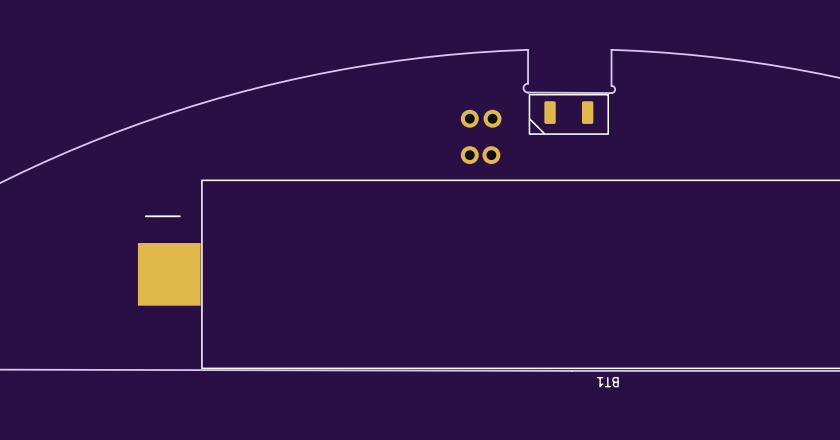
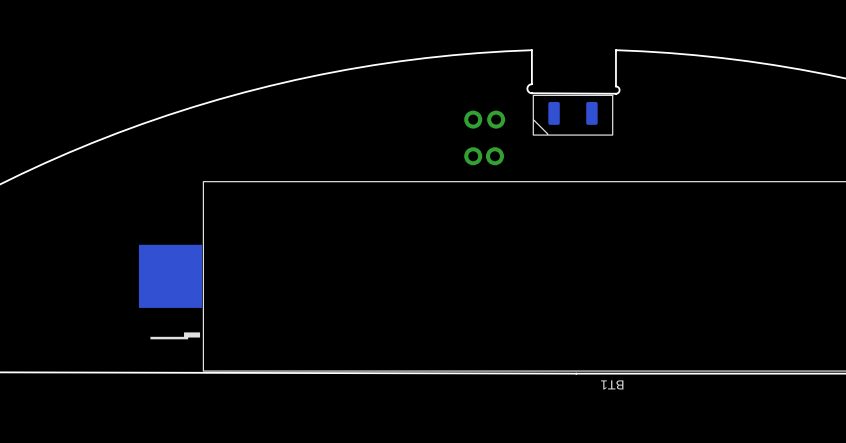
BT1 text position: - (162, 216) -> - (192, 334)
text: none -> _ (169, 338)

